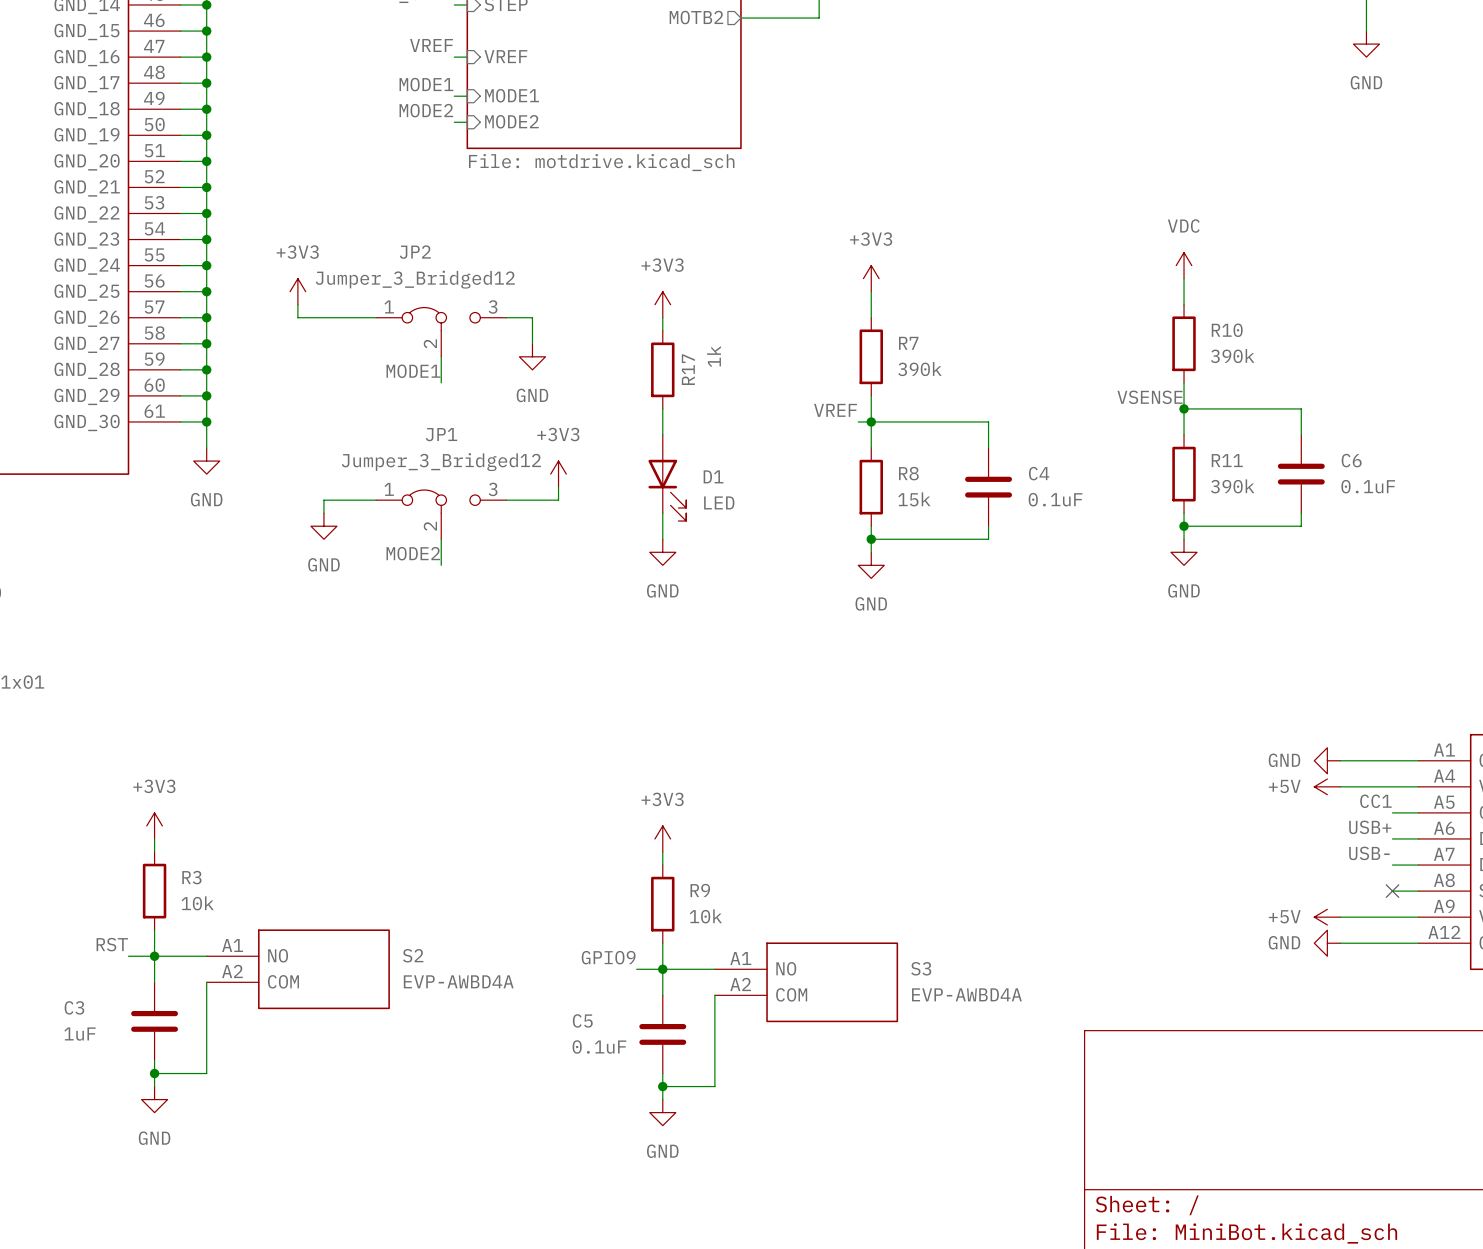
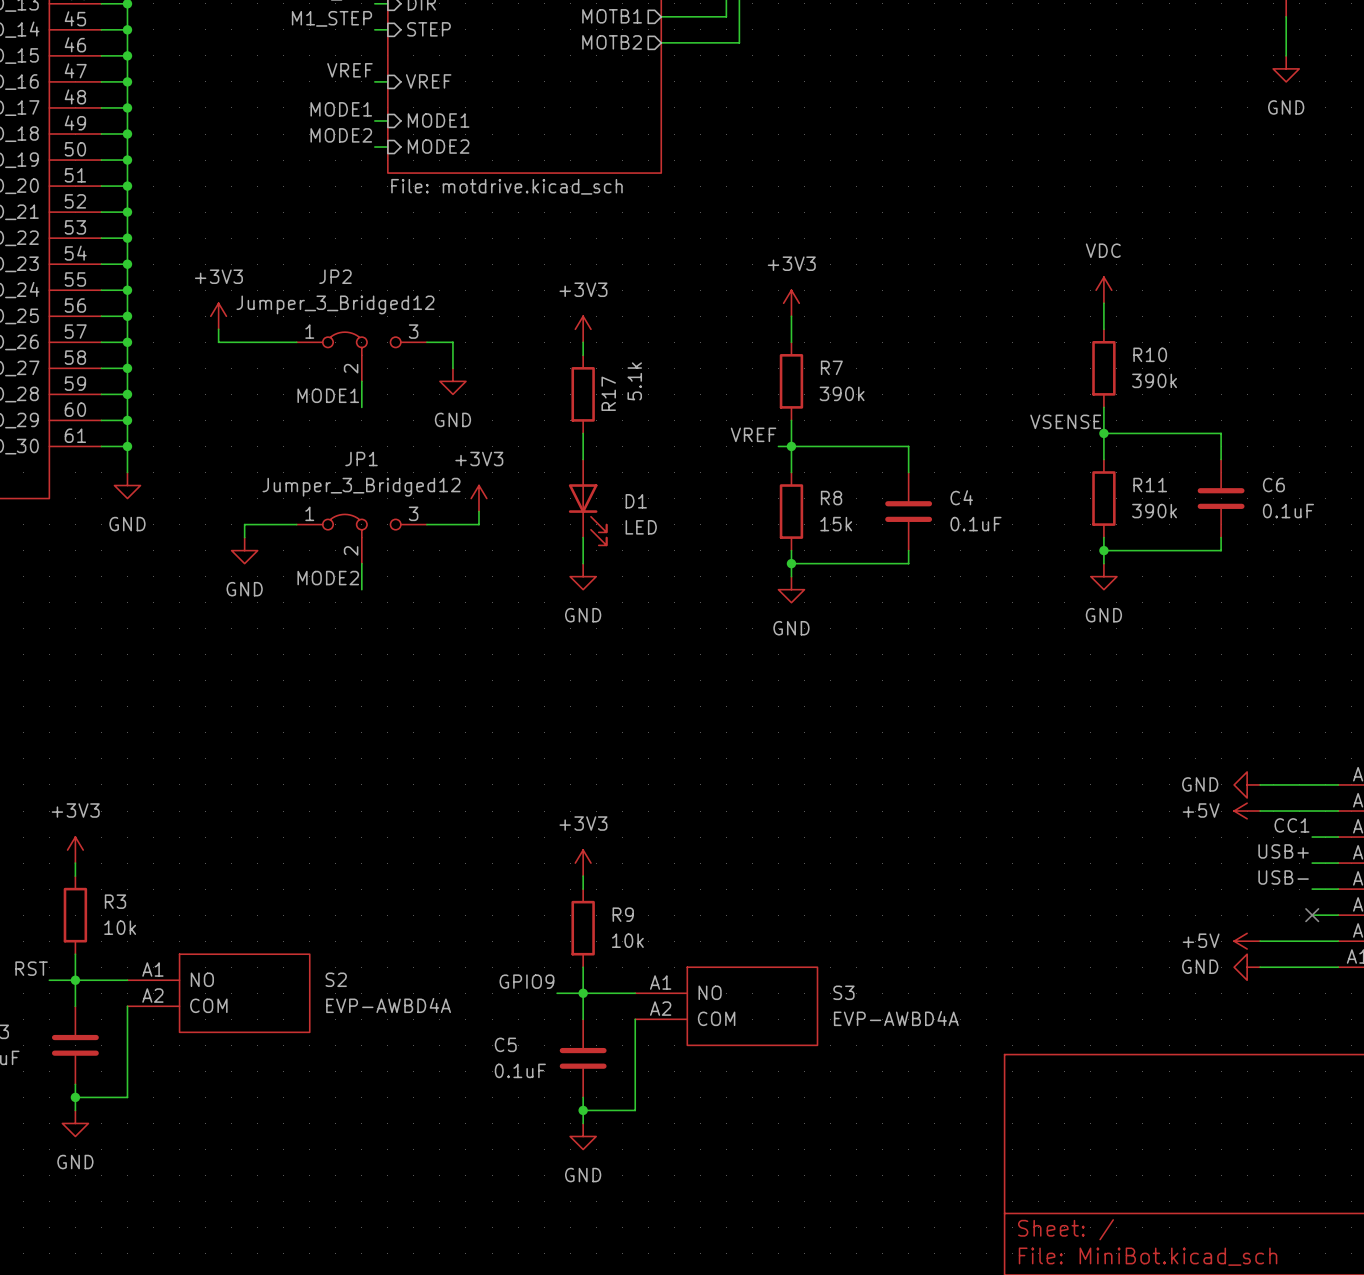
R17 value: 1k (714, 356) -> 5.1k (634, 381)

